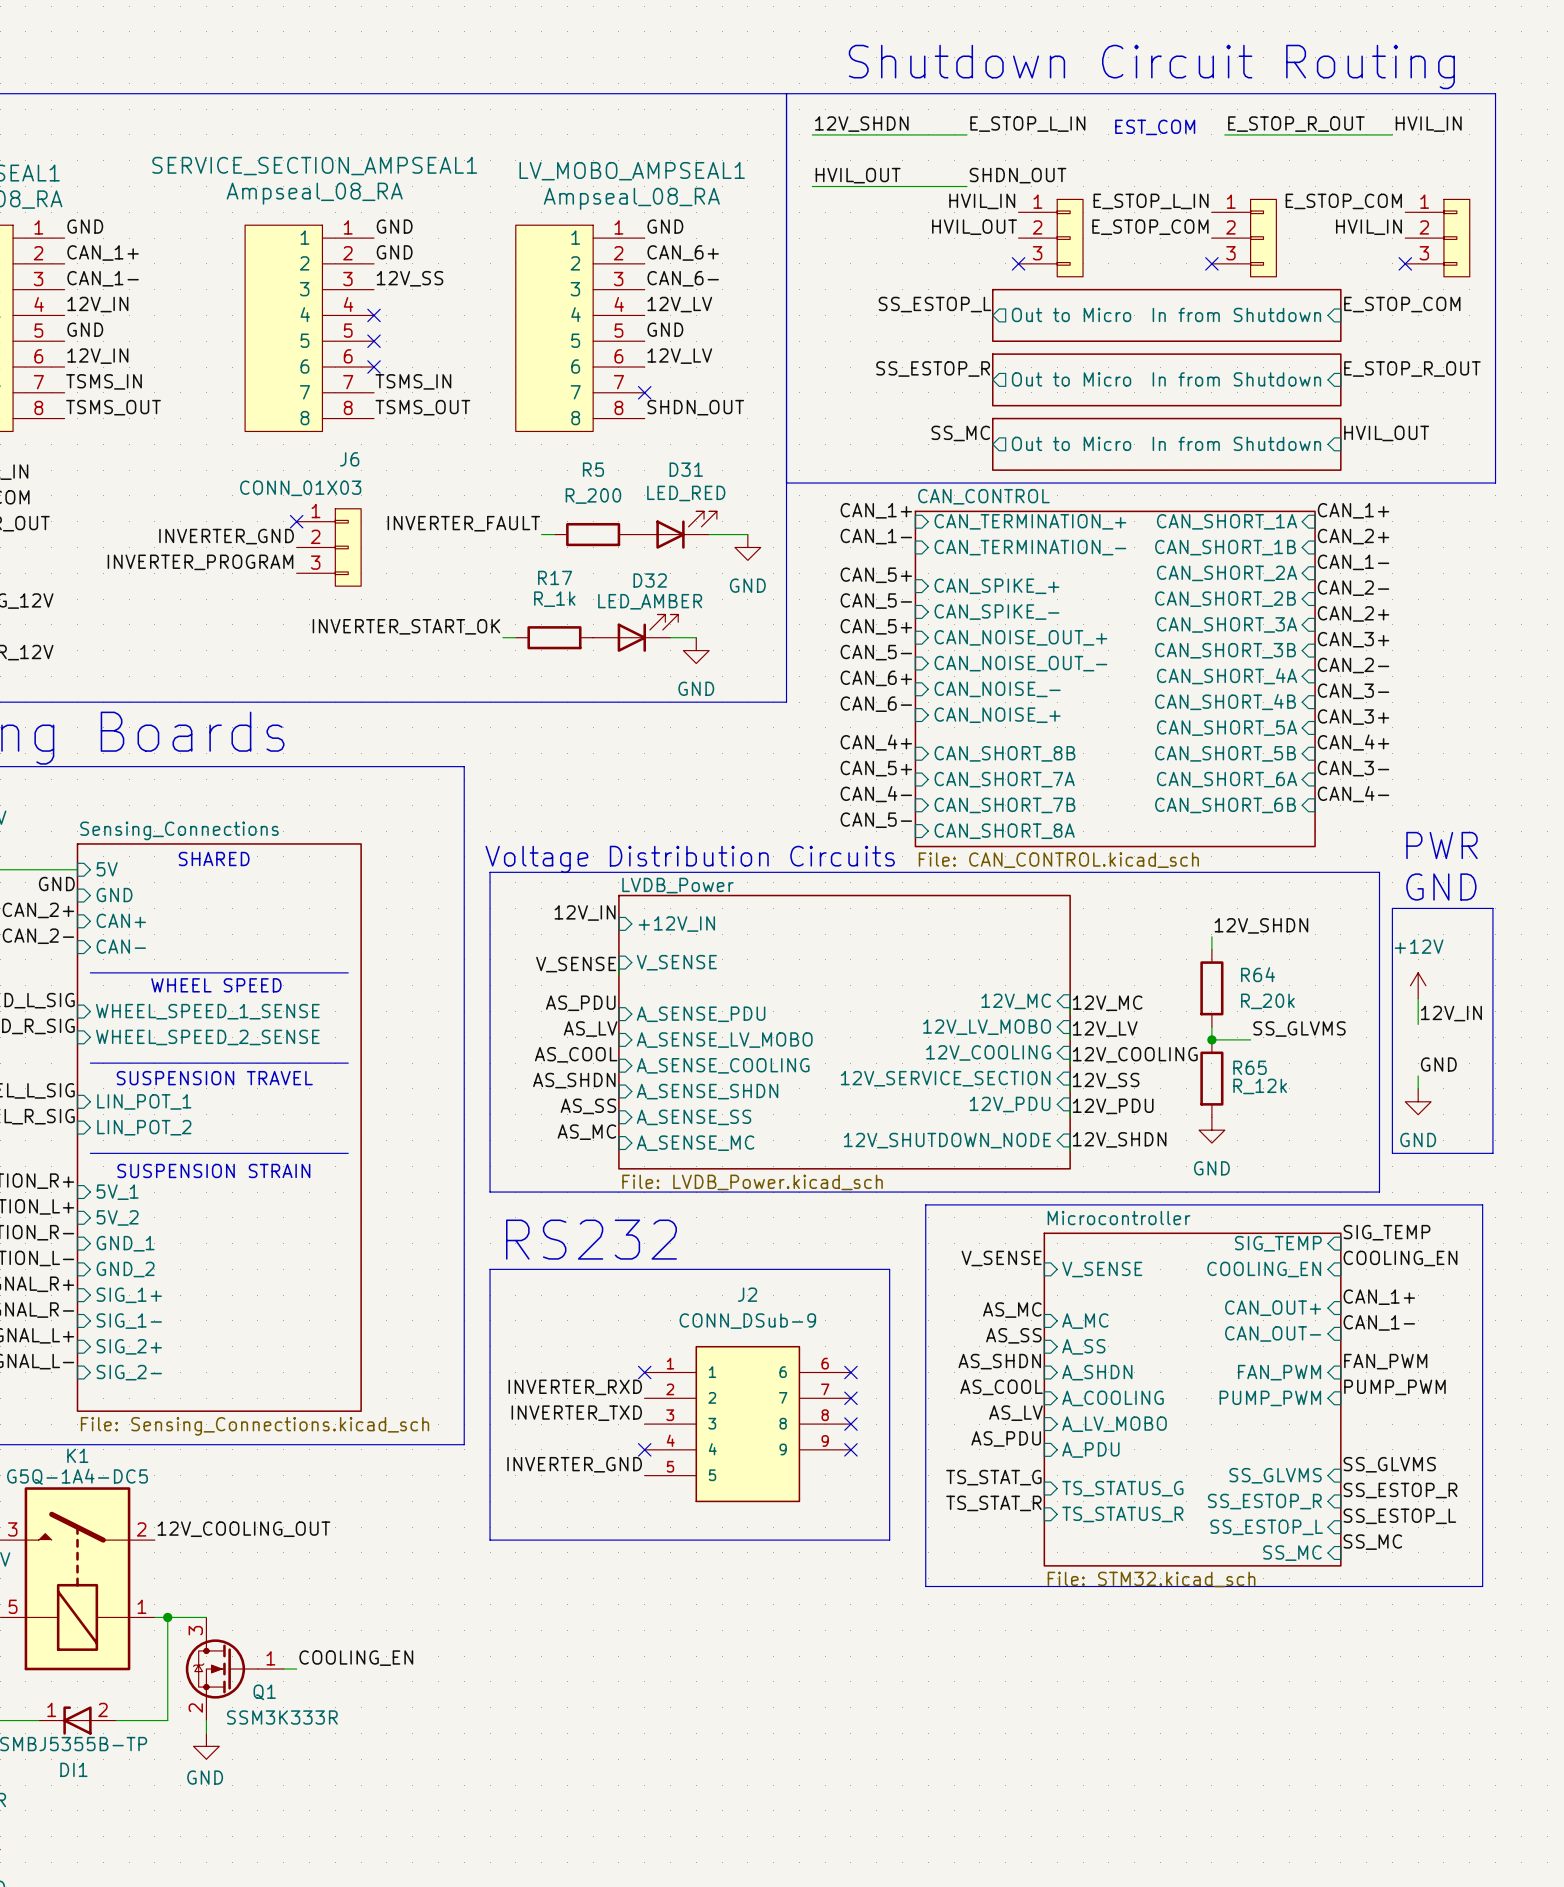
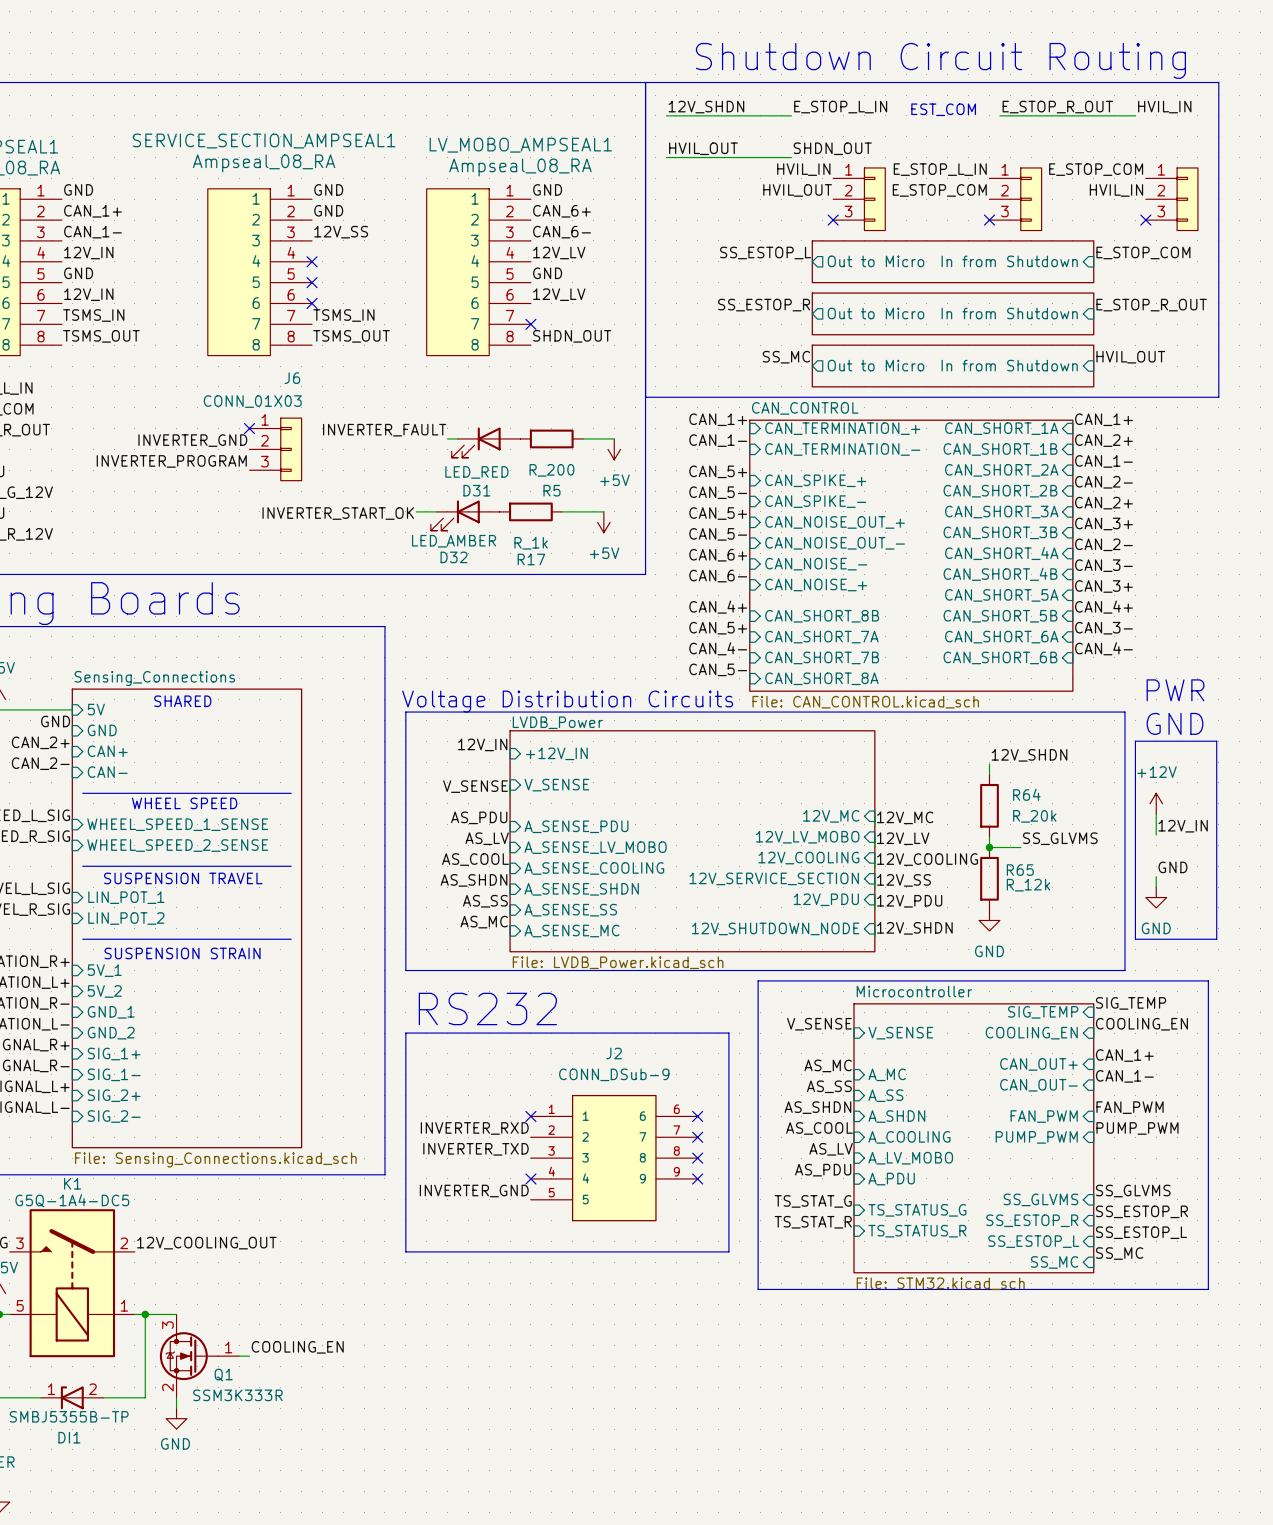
R5 name position: R5 (593, 469) -> R5 (552, 490)
R5 value position: R_200 (593, 496) -> R_200 (552, 470)
D31 position: (674, 530) -> (486, 442)
D31 rotation: 0° (686, 530) -> 180° (476, 442)
R5 position: (593, 534) -> (551, 438)
power symbol: GND (747, 547) -> +5V (614, 449)
R17 name position: R17 (555, 577) -> R17 (531, 559)
R17 value position: R_1k (554, 599) -> R_1k (531, 543)
wire: none -> (562, 511) (603, 511)
D32 position: (635, 633) -> (465, 515)
D32 rotation: 0° (647, 633) -> 180° (455, 515)
wire: (502, 637) (515, 637) -> none
R17 position: (554, 637) -> (530, 511)
wire: (670, 637) (696, 637) -> (416, 511) (437, 511)
power symbol: none -> +5V (603, 522)
power symbol: GND (696, 650) -> none

